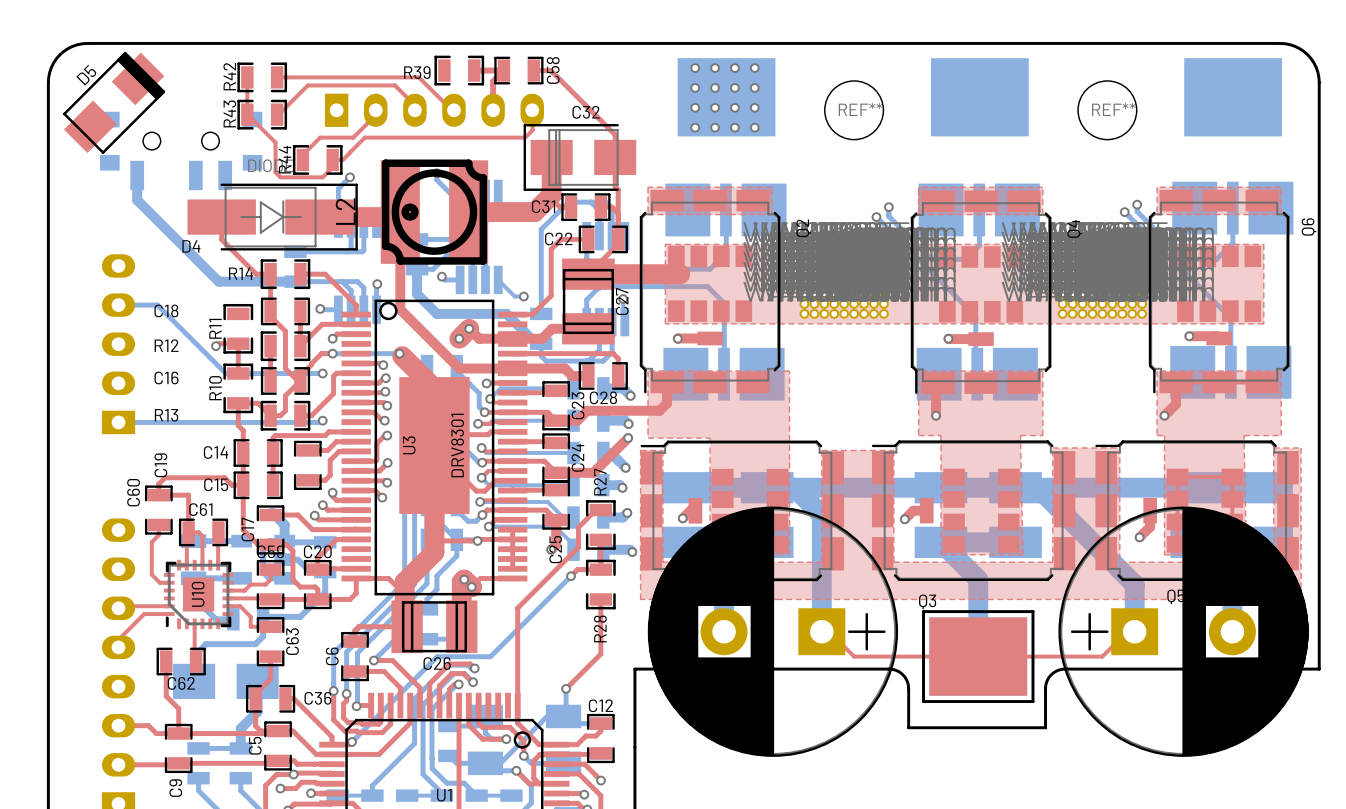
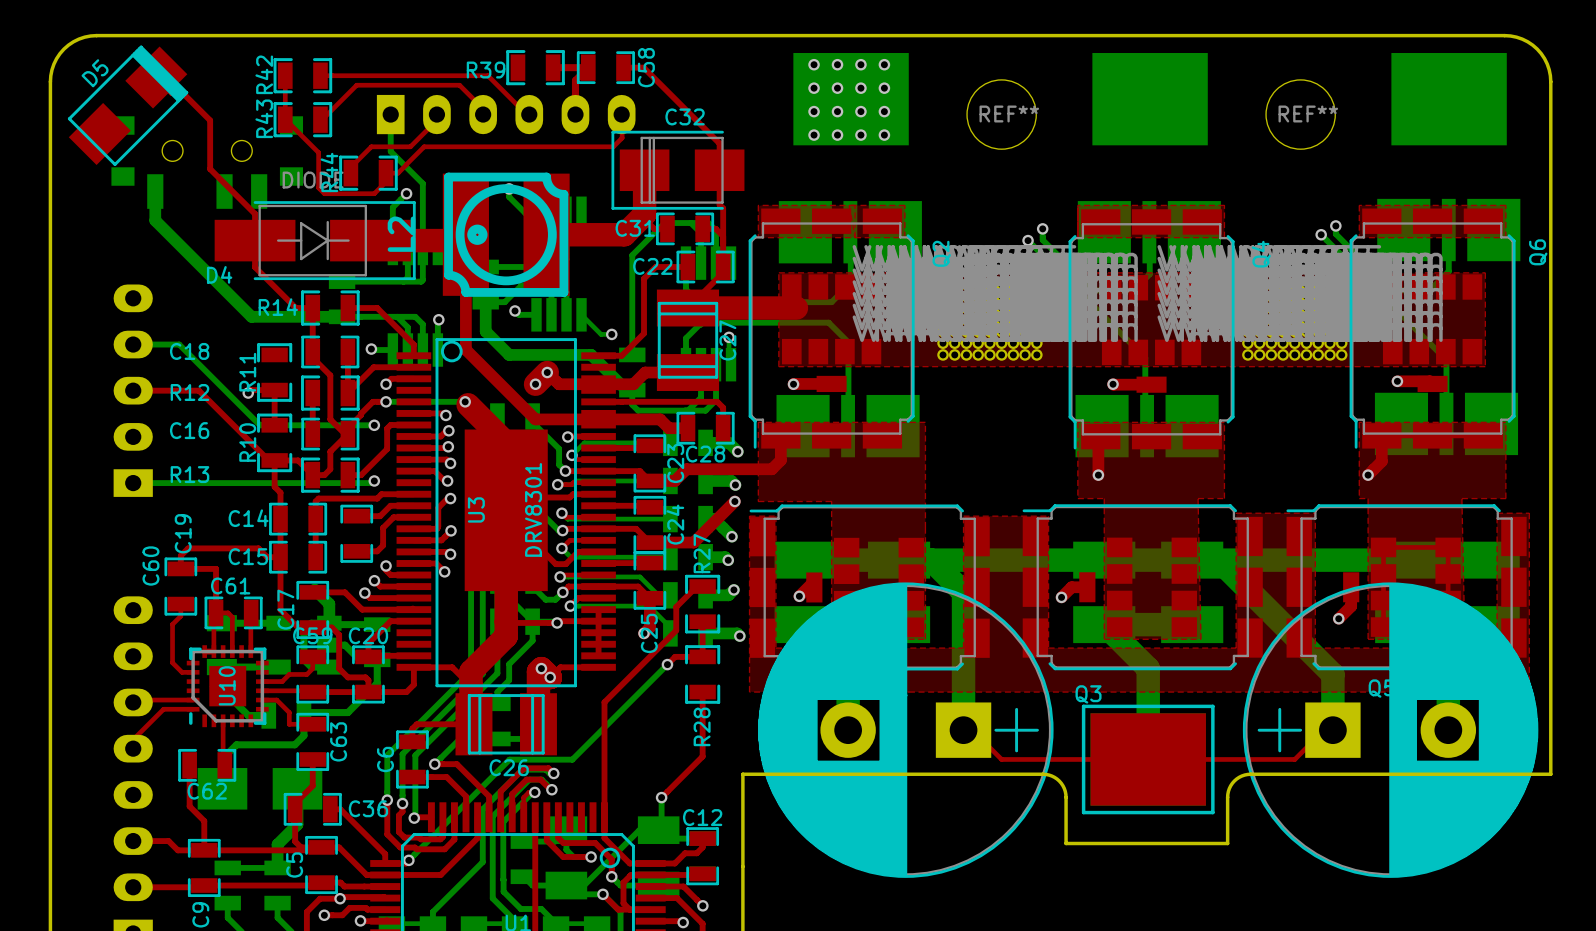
top track: none -> (156, 77) (171, 93) (182, 93) (210, 120) (210, 169) (255, 213) (255, 240)
bottom track: none -> (390, 114) (390, 151) (422, 183) (422, 248)
top track: none -> (133, 390) (198, 390) (268, 460) (274, 460)

